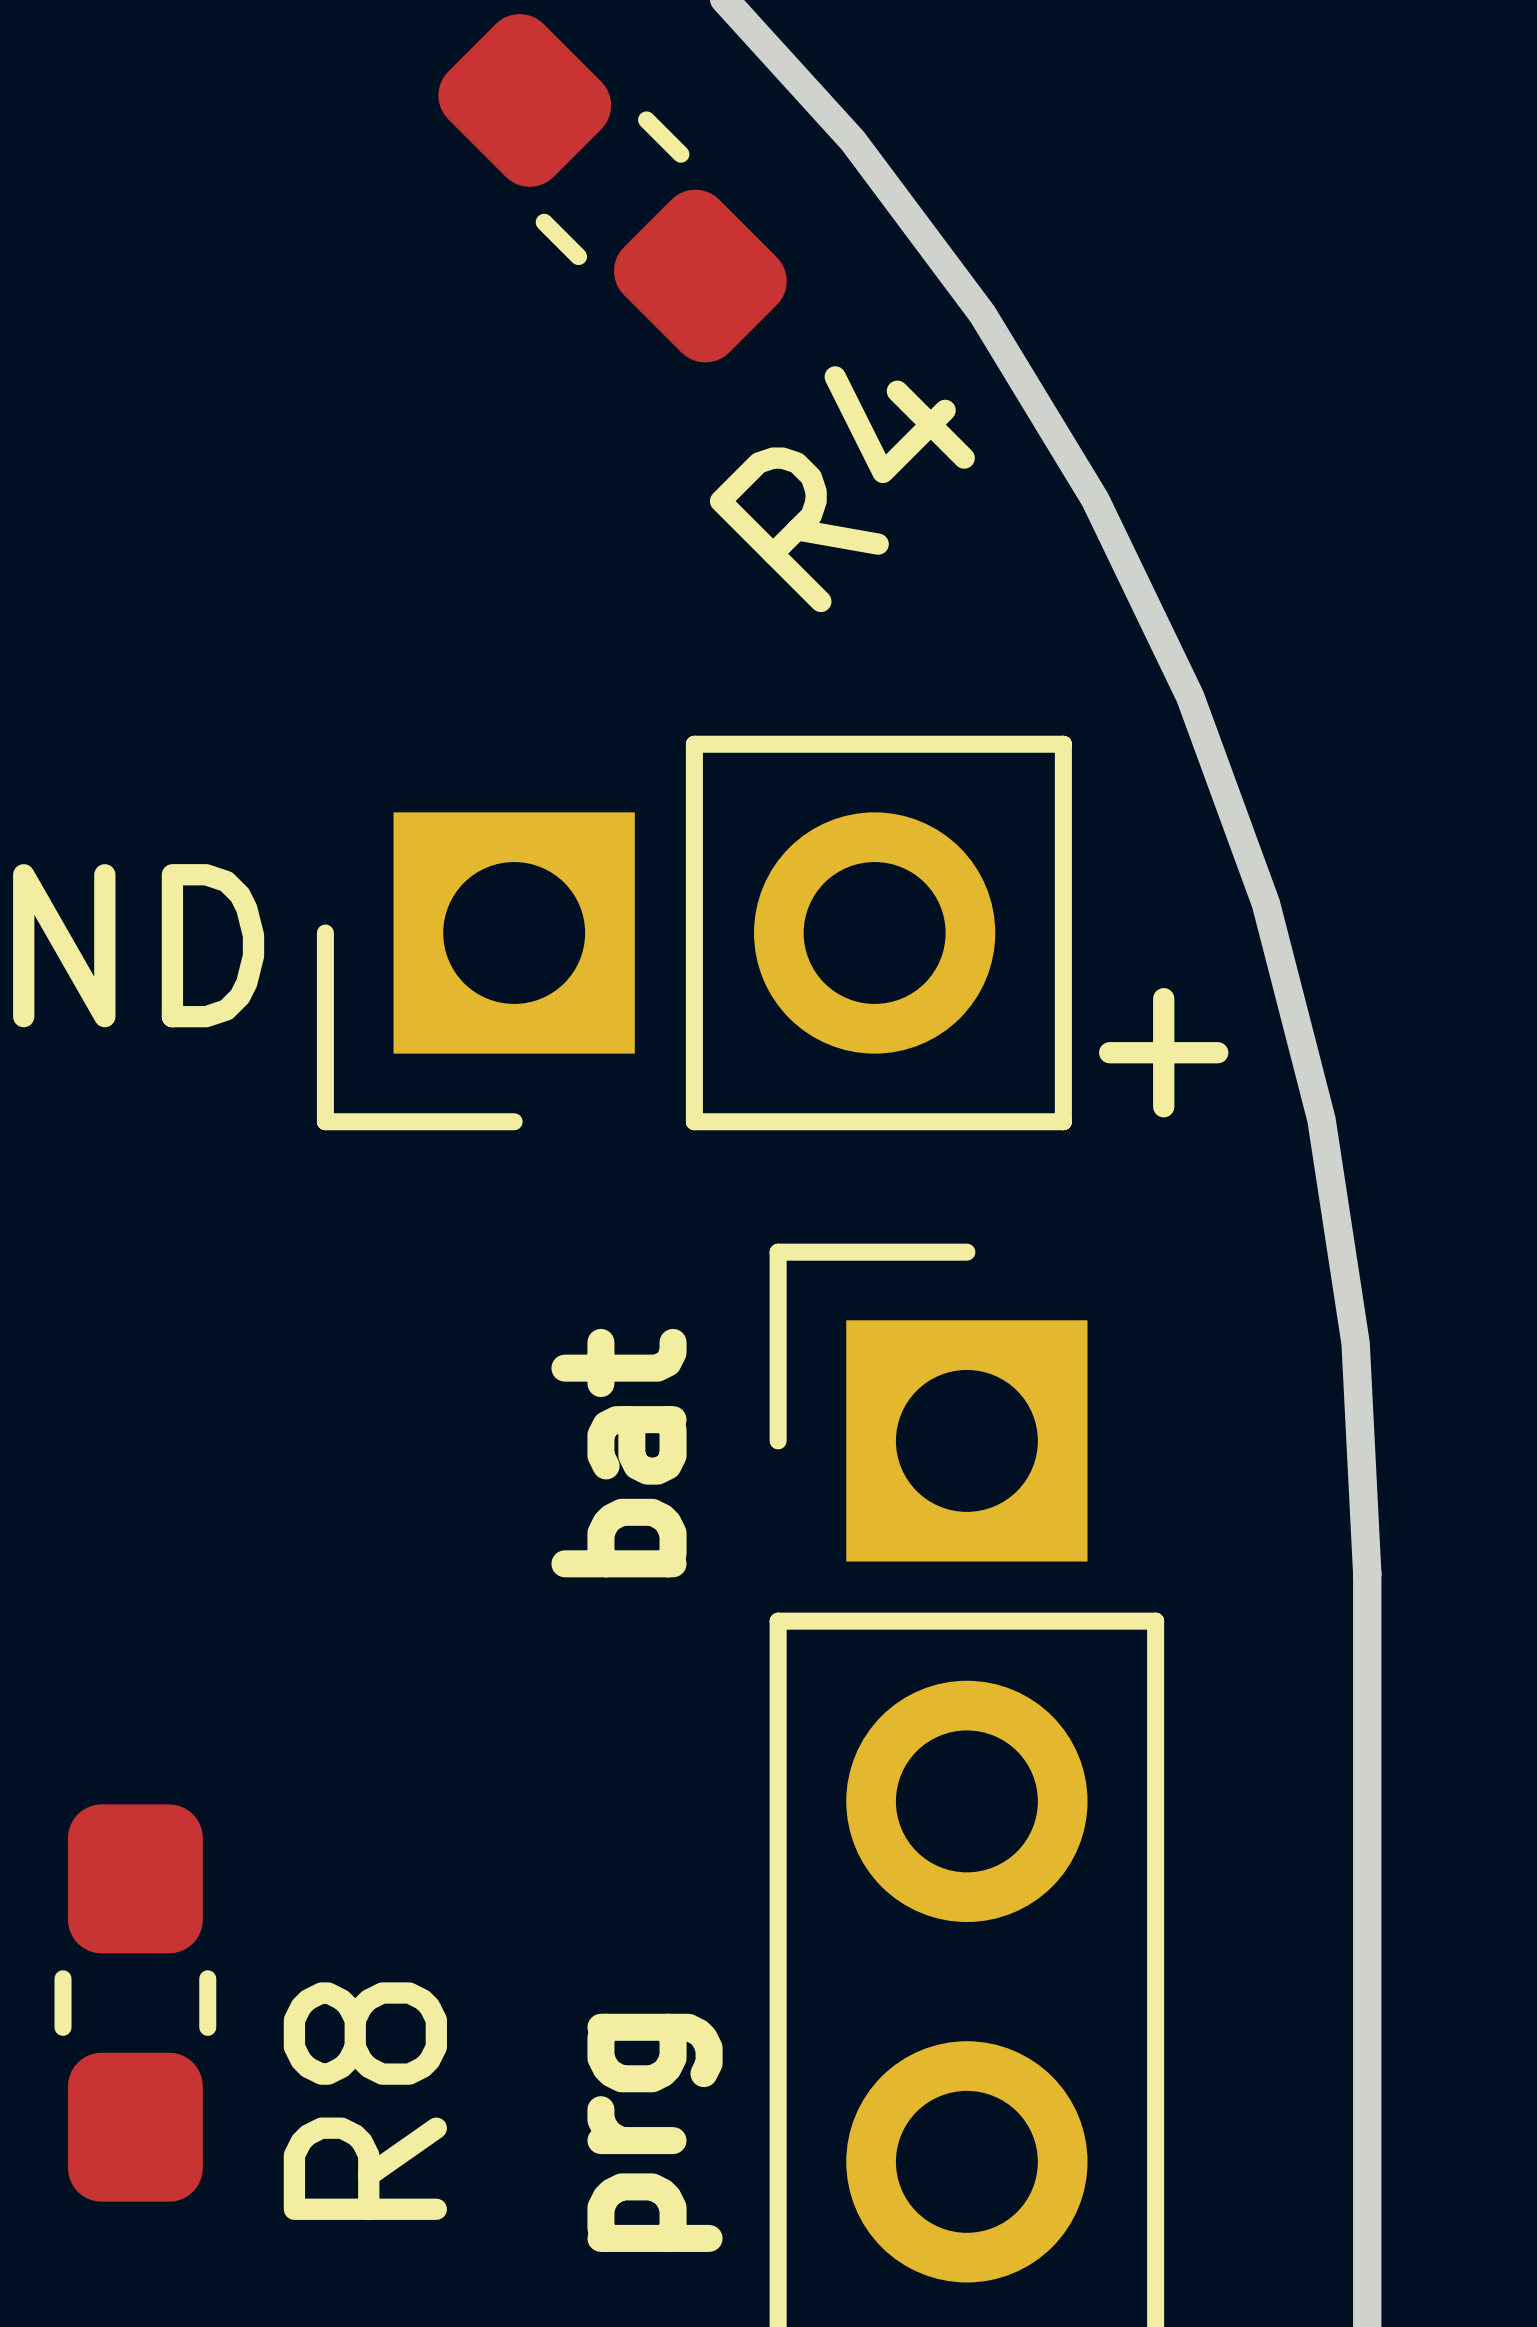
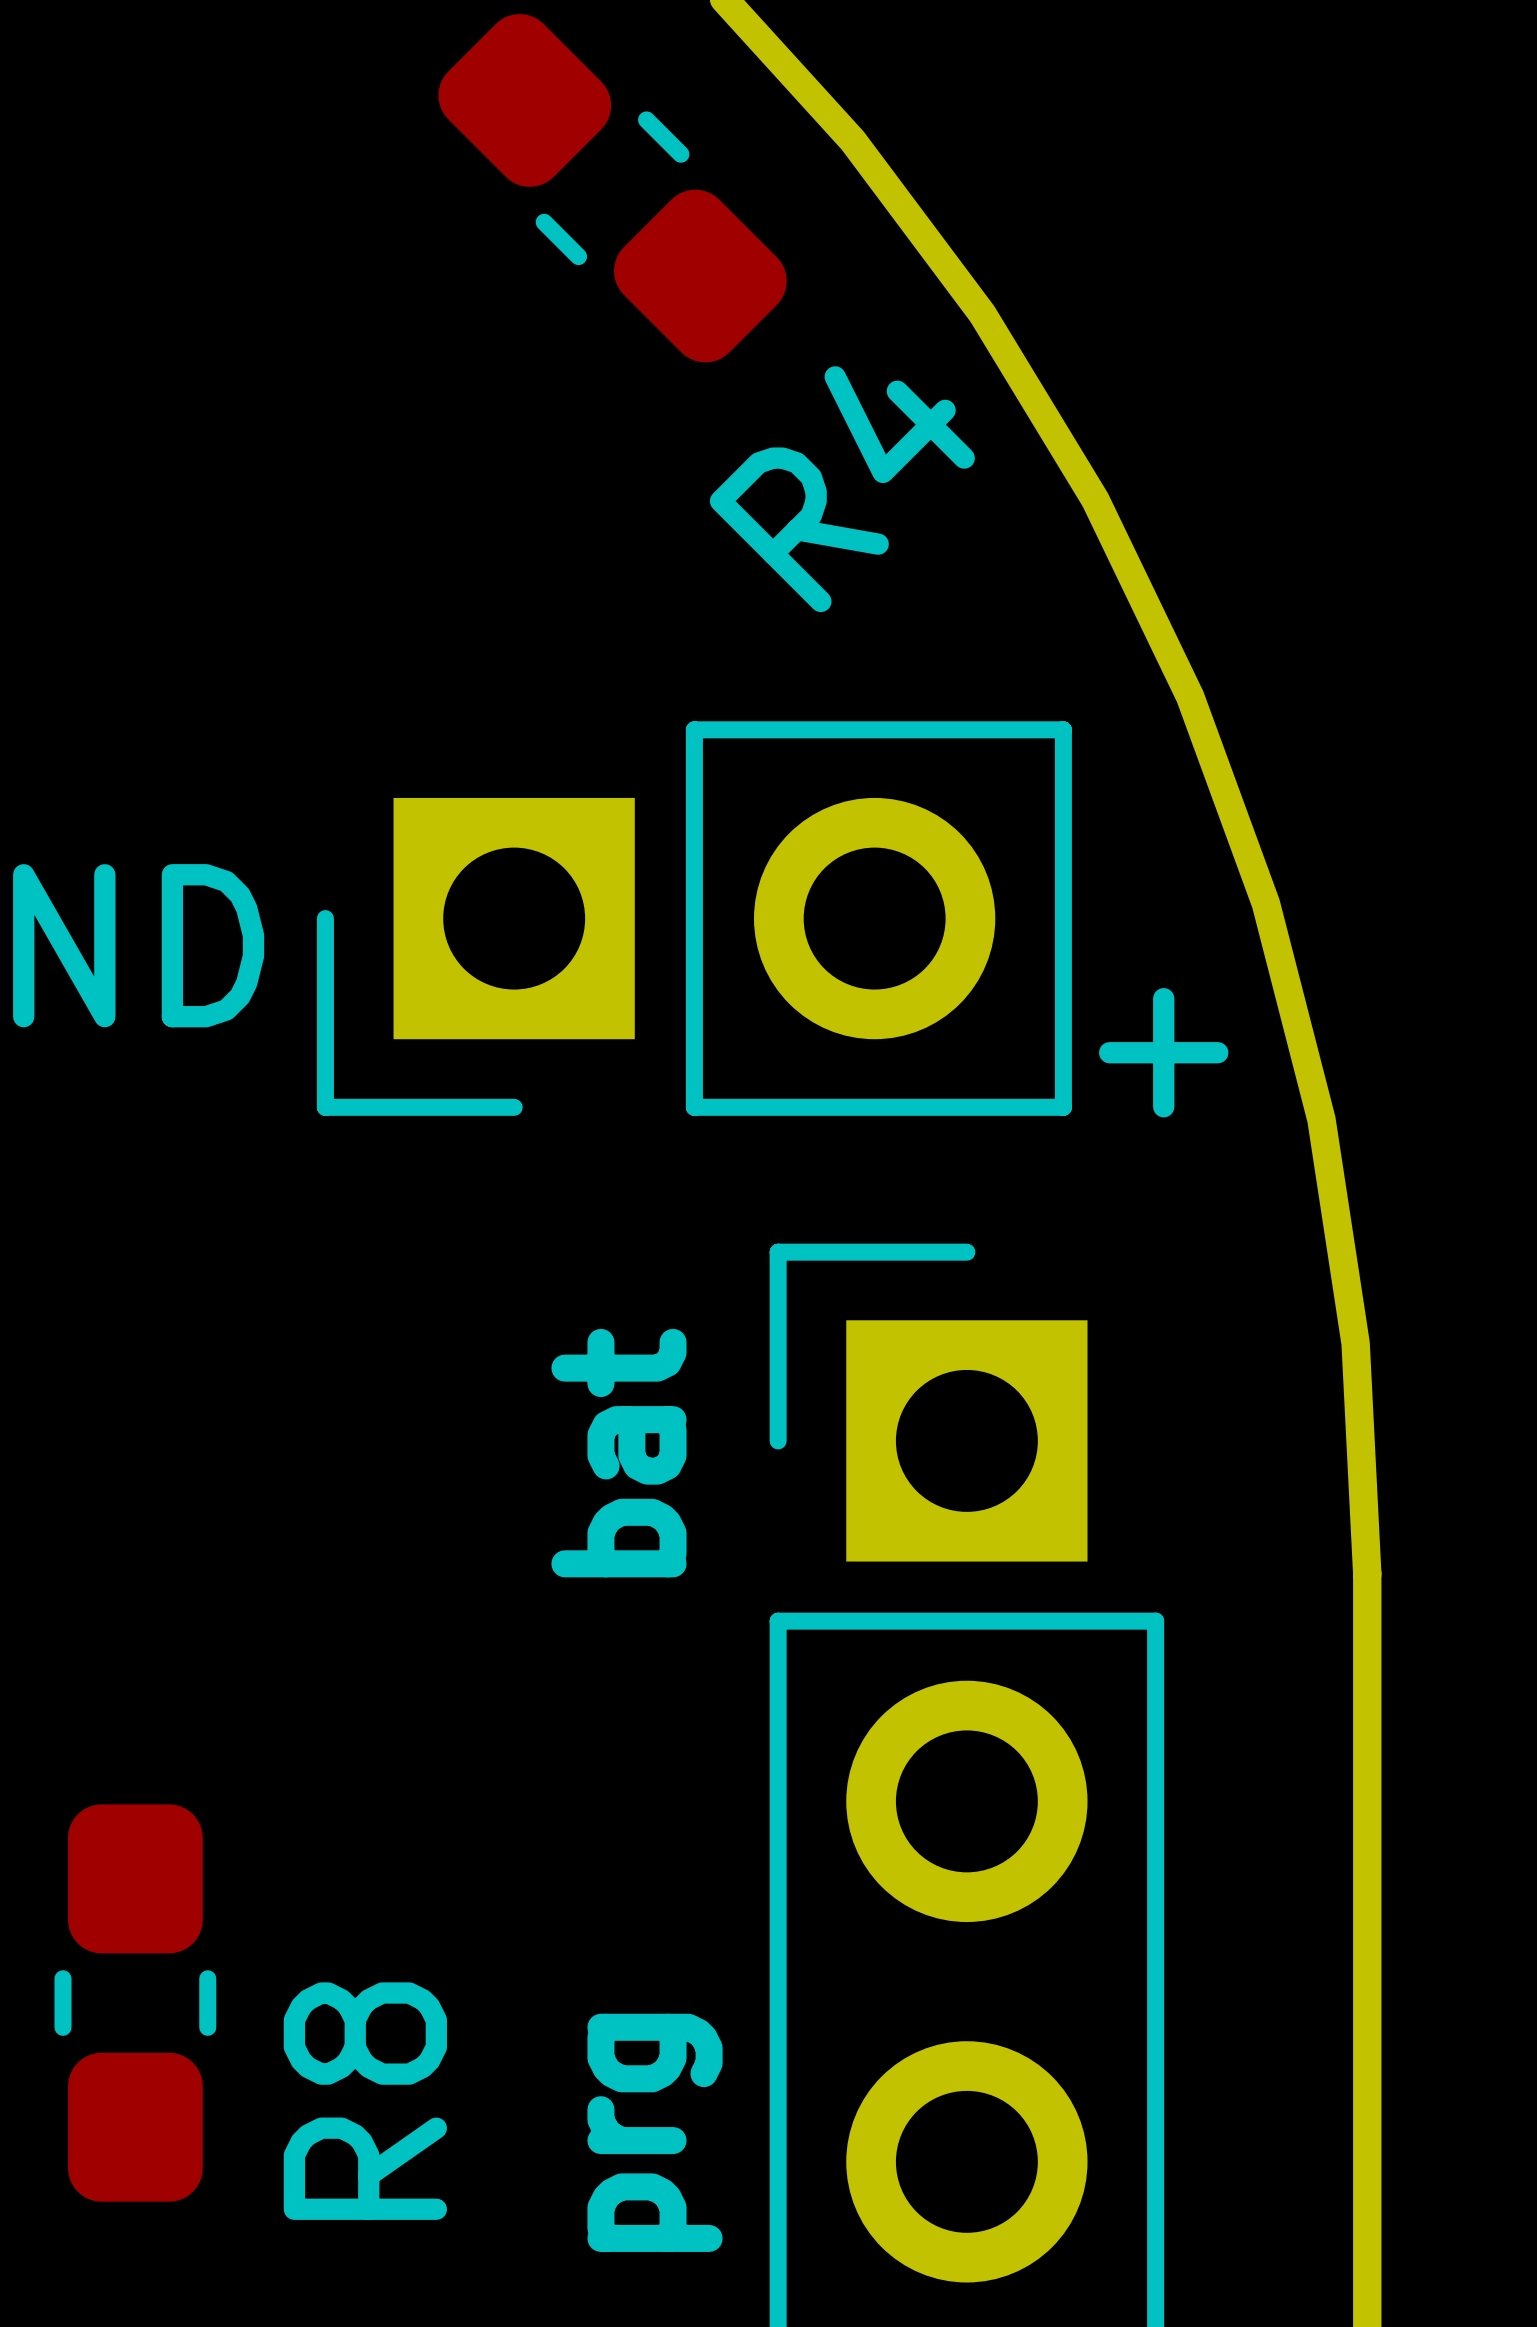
part position: (694, 932) -> (694, 918)

